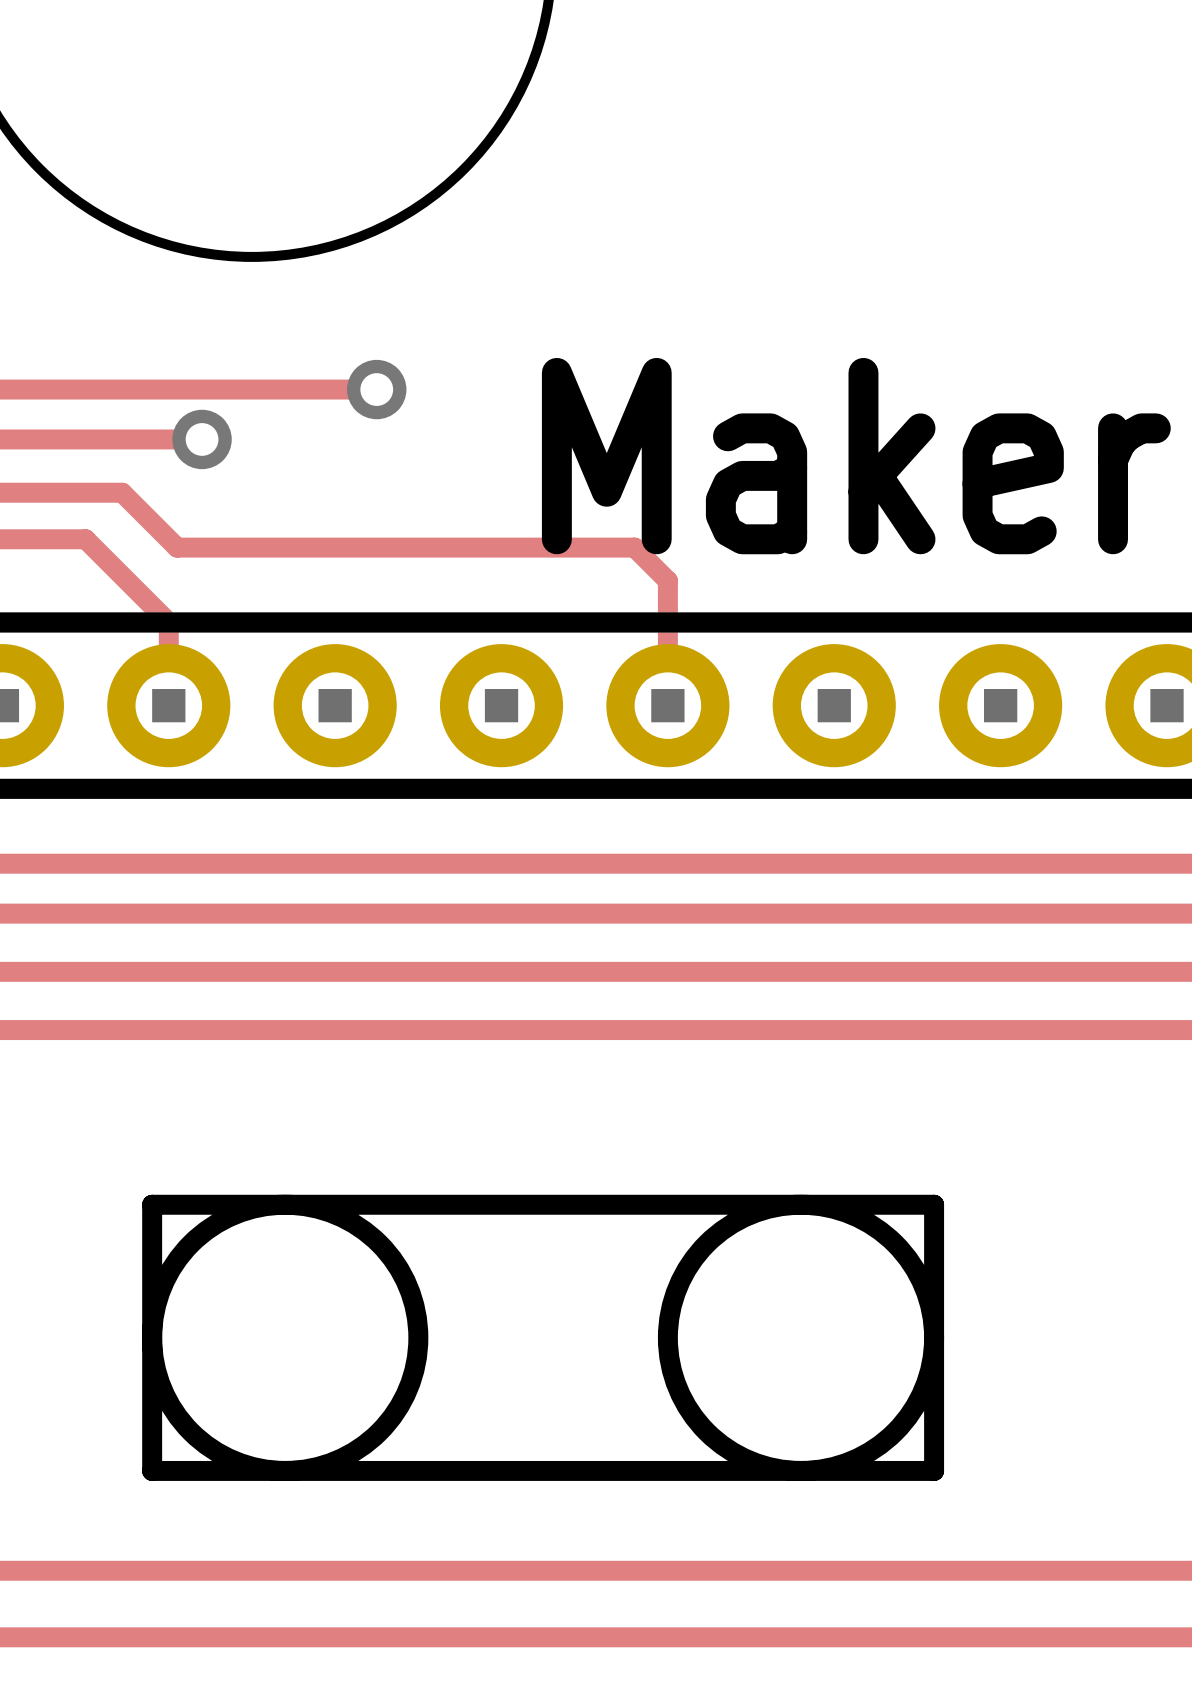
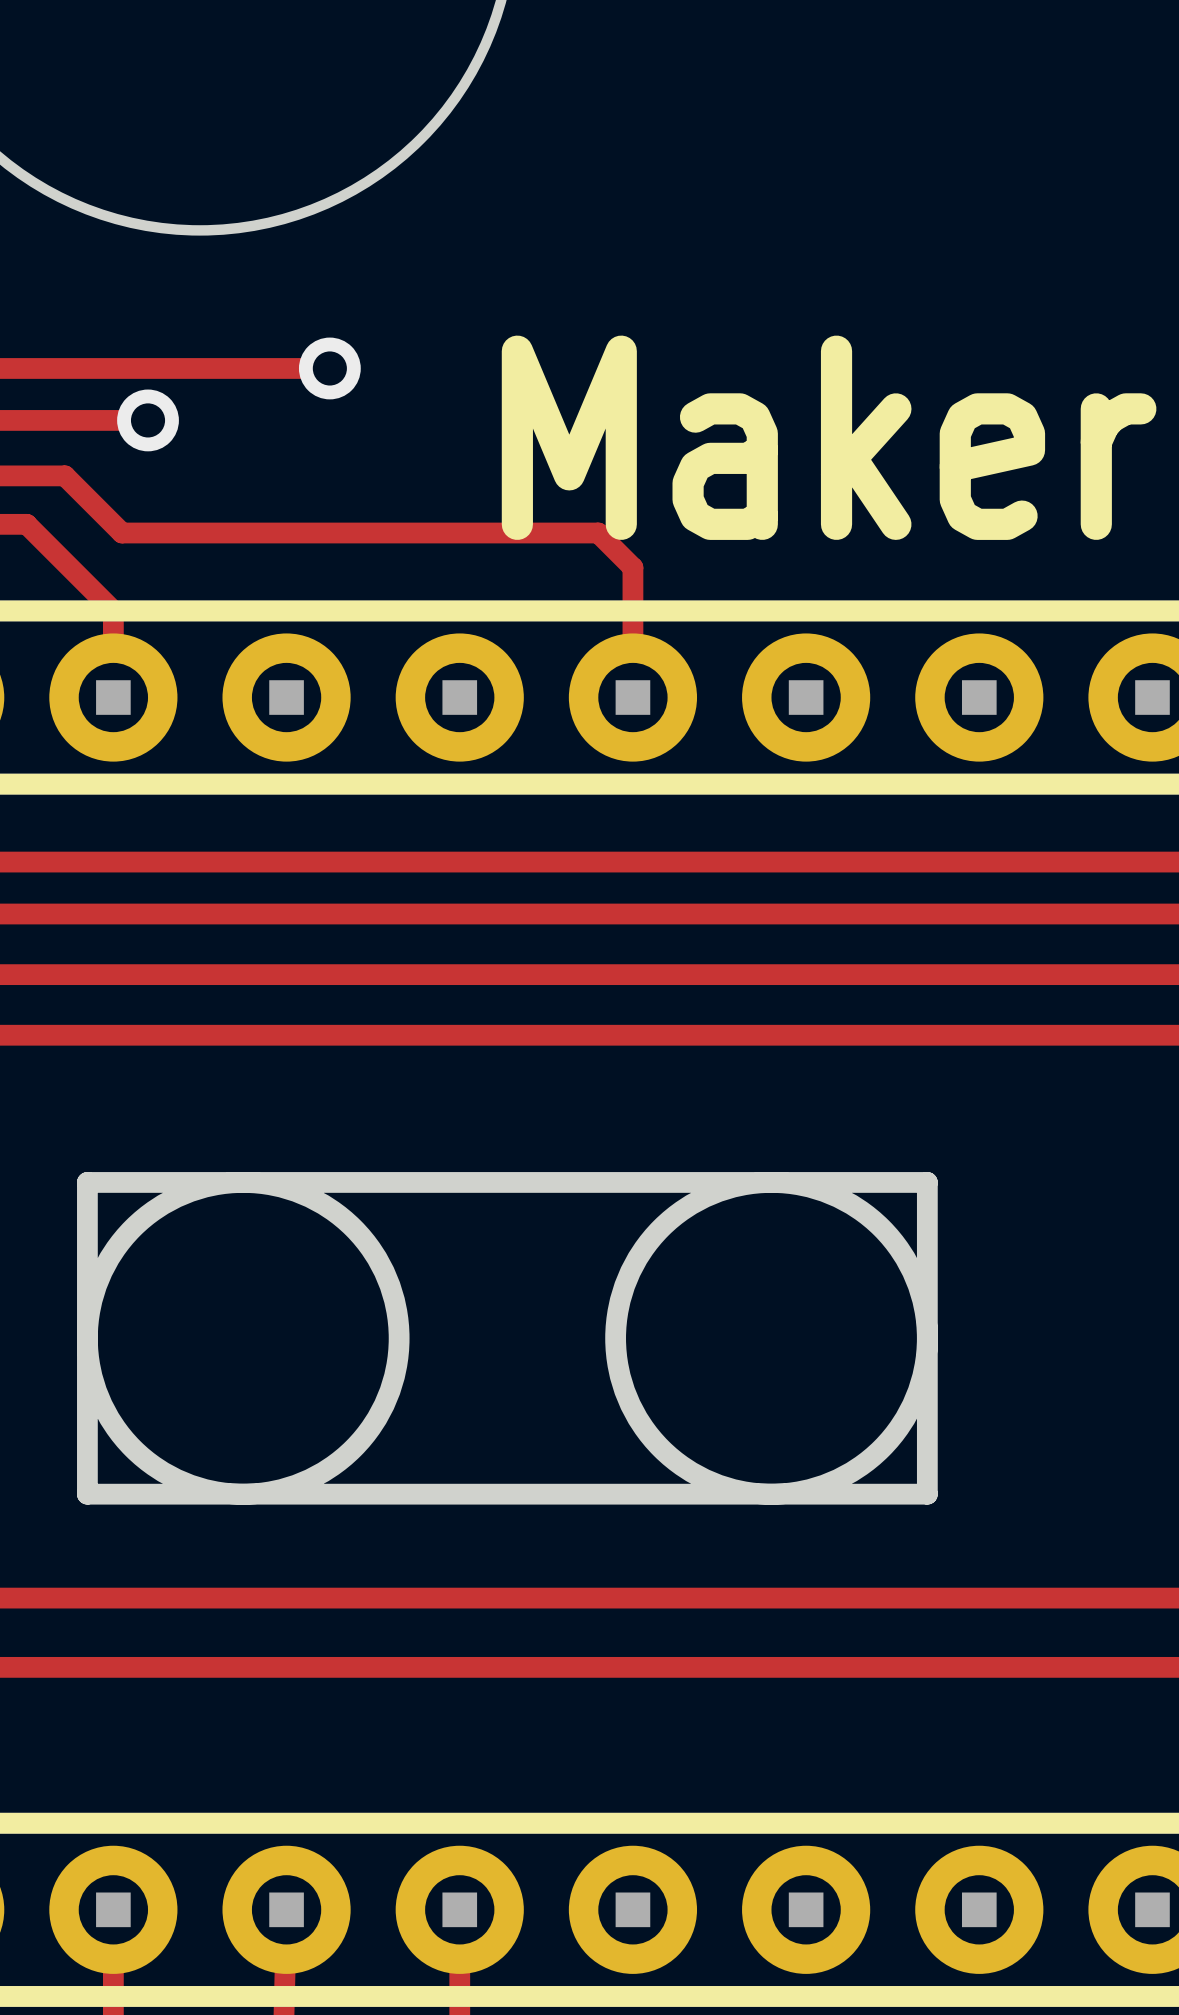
round board edge size: [142, 1194, 429, 1481] -> [77, 1172, 410, 1505]
round board edge size: [657, 1194, 945, 1481] -> [605, 1172, 938, 1505]
board edge: (152, 1470) (152, 1204) (934, 1204) (934, 1470) -> (96, 1494) (87, 1494) (87, 1182) (927, 1182) (927, 1494) (910, 1494)

